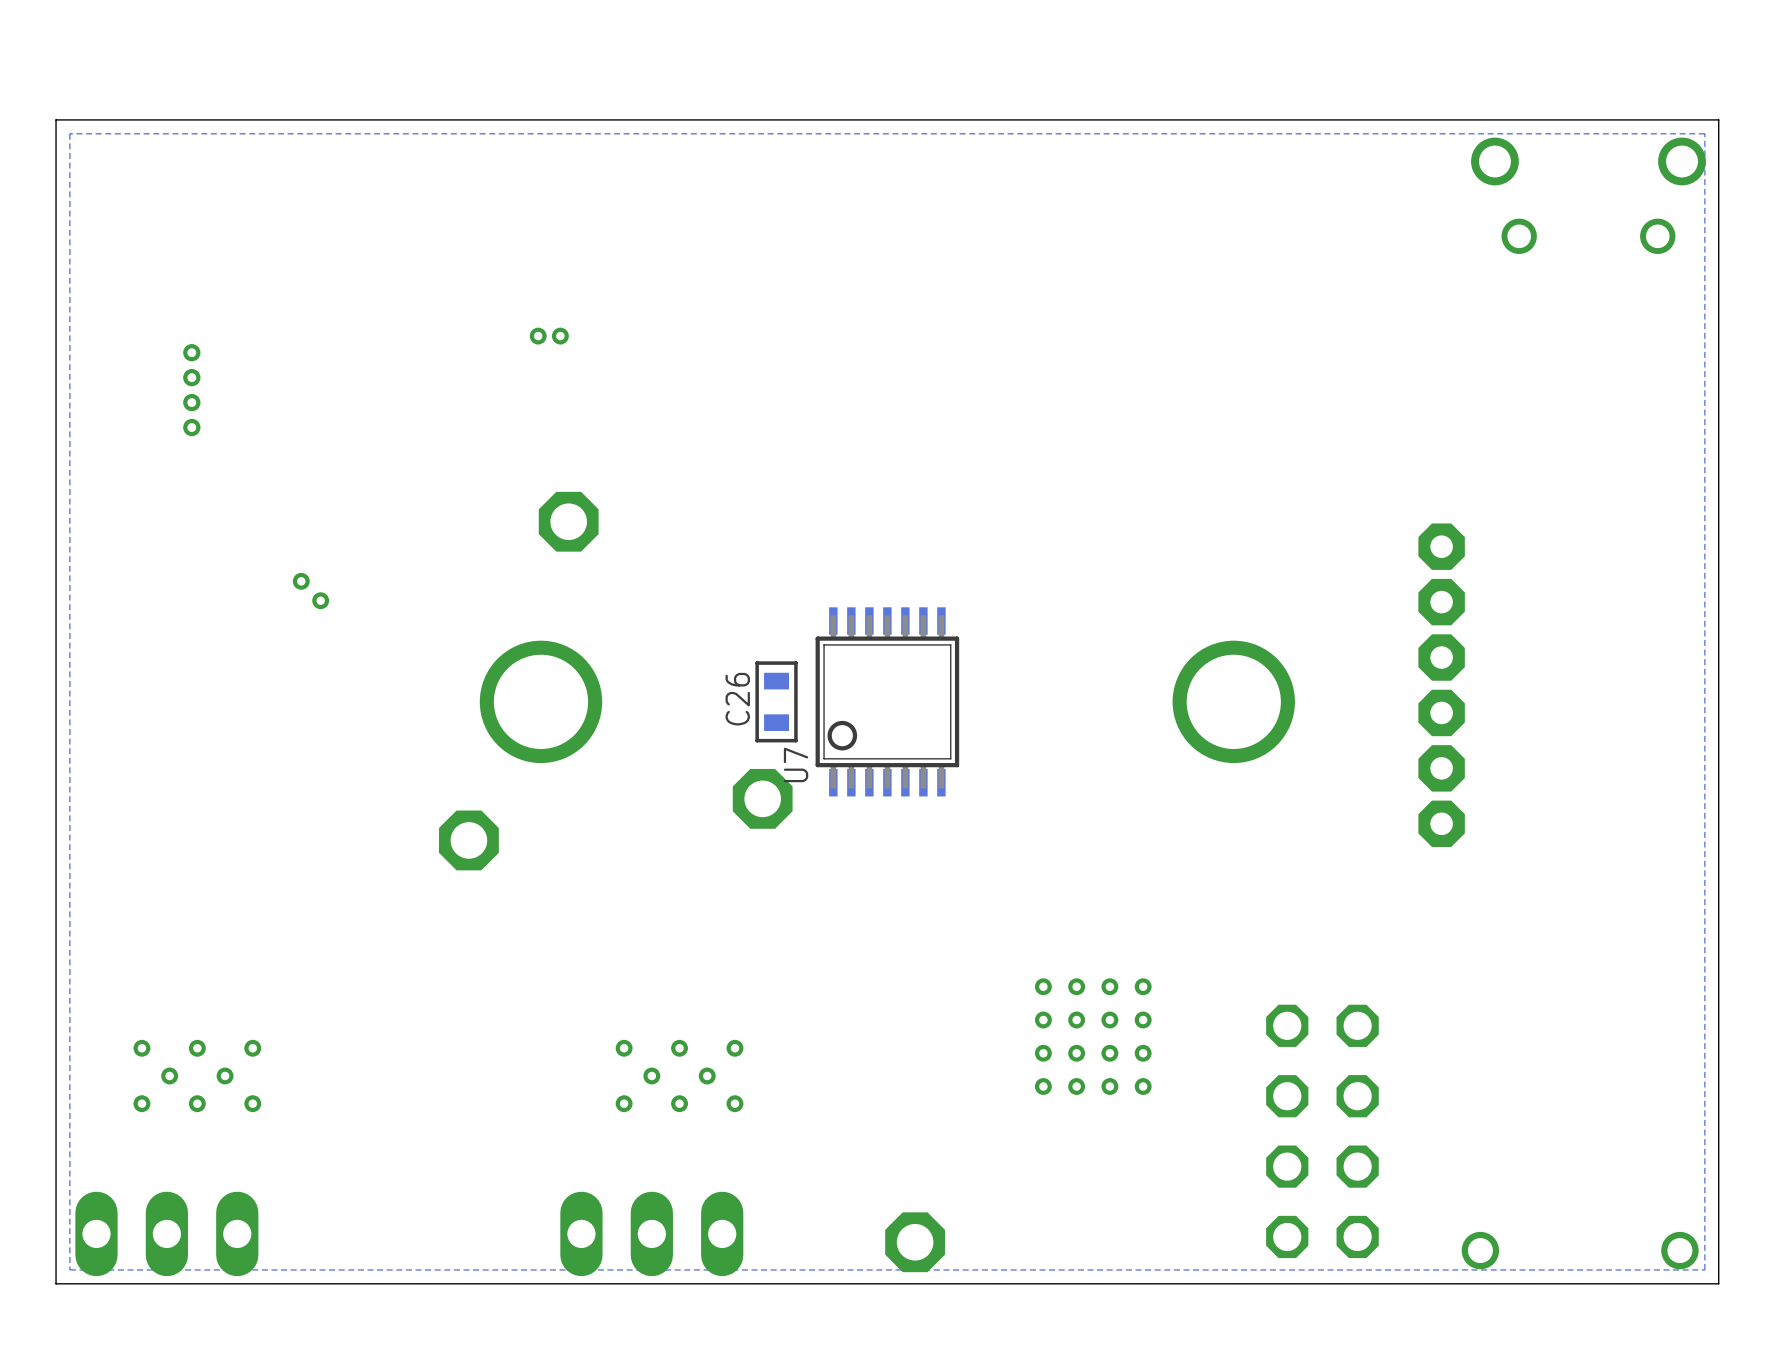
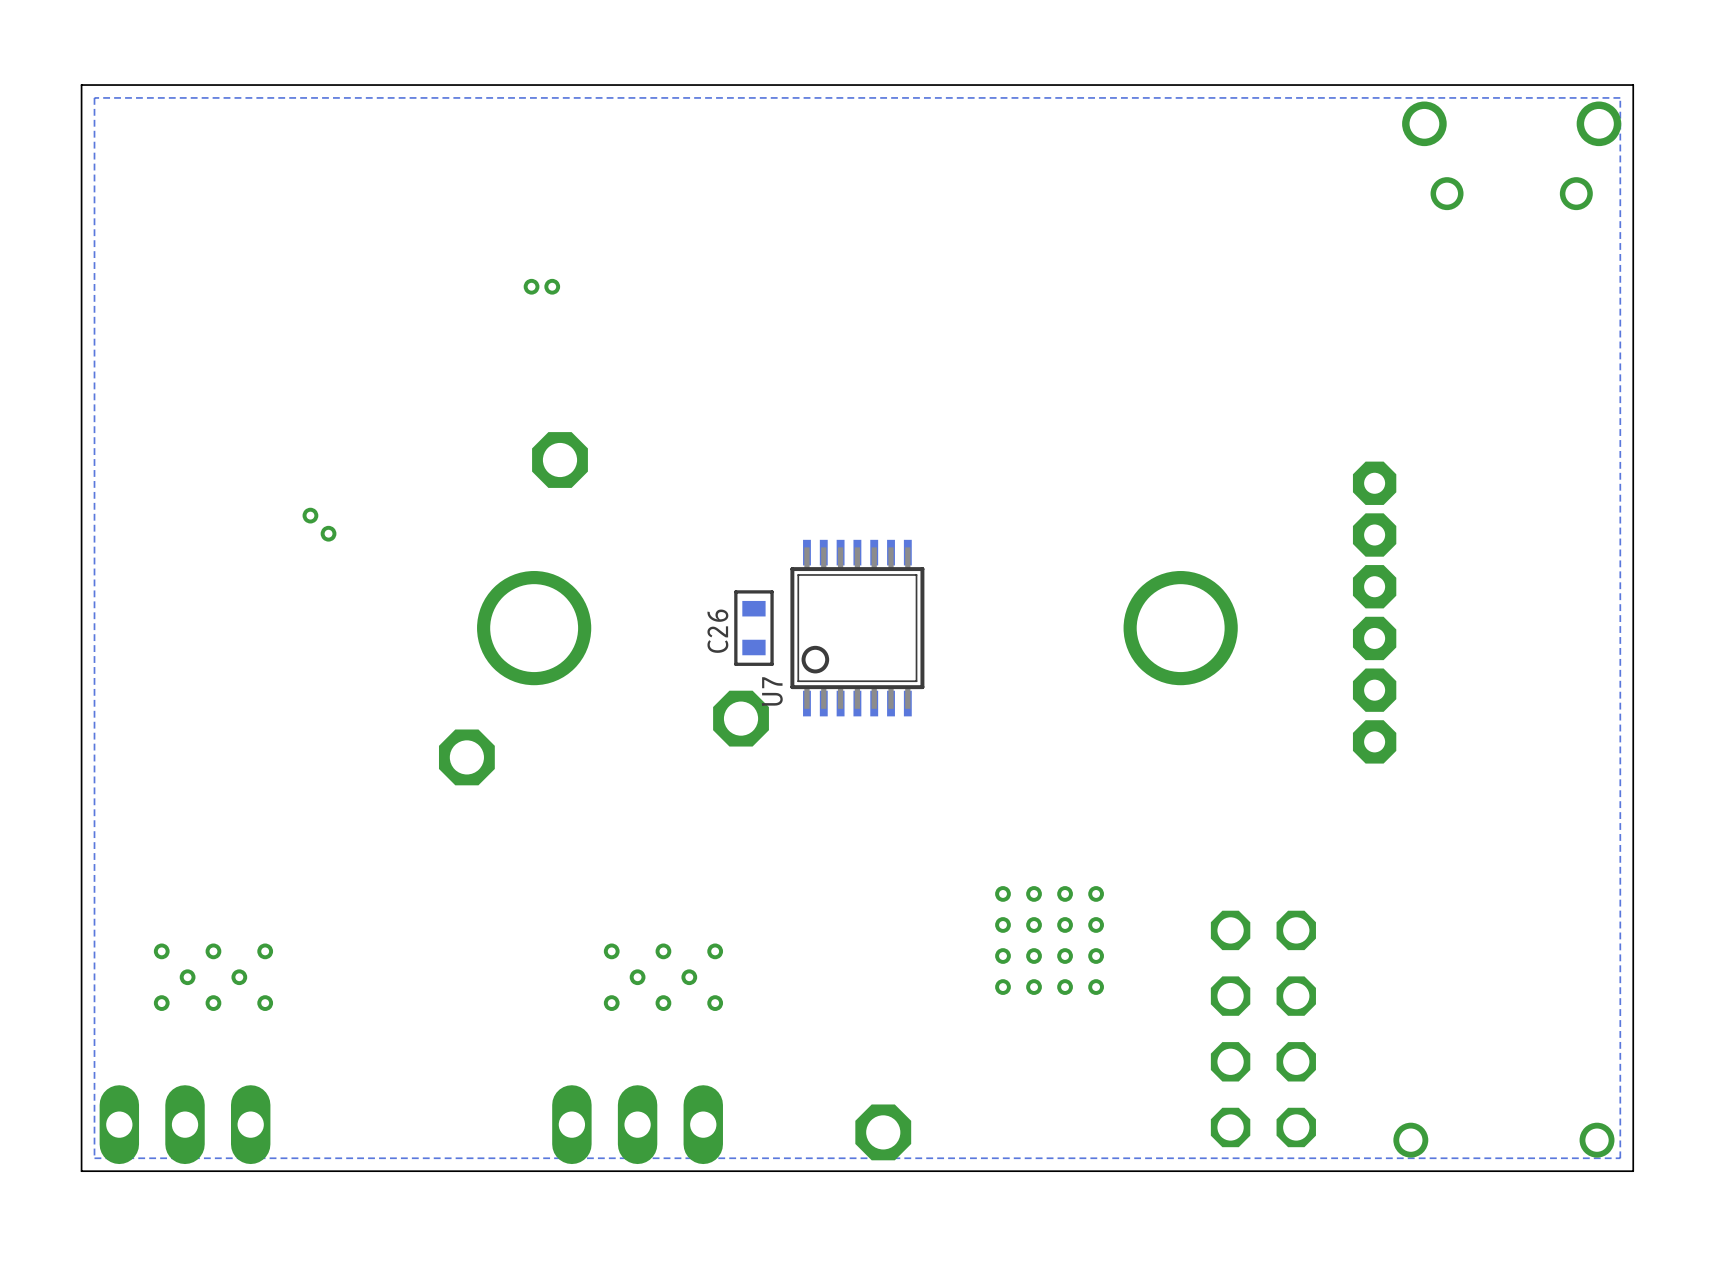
via: (191, 352) -> none
via: (191, 377) -> none
via: (191, 402) -> none
via: (191, 427) -> none

